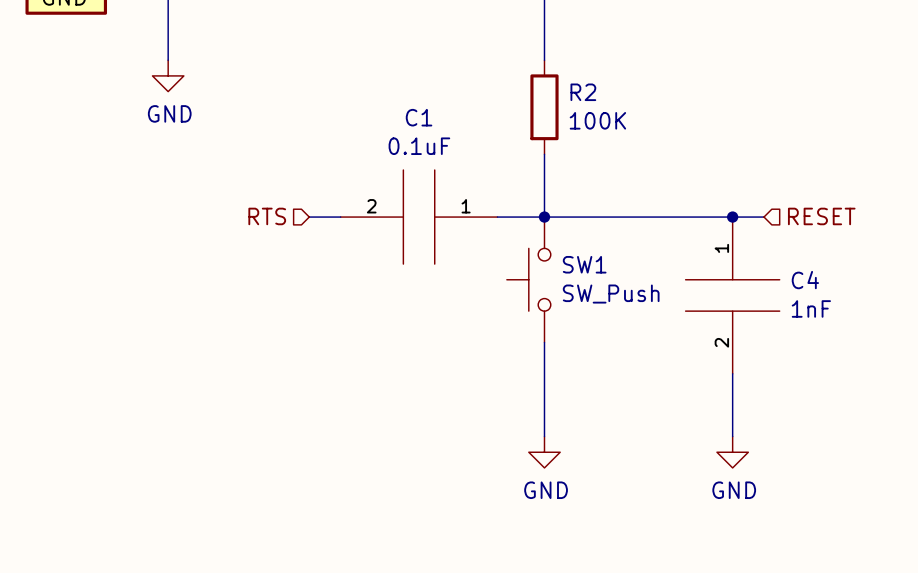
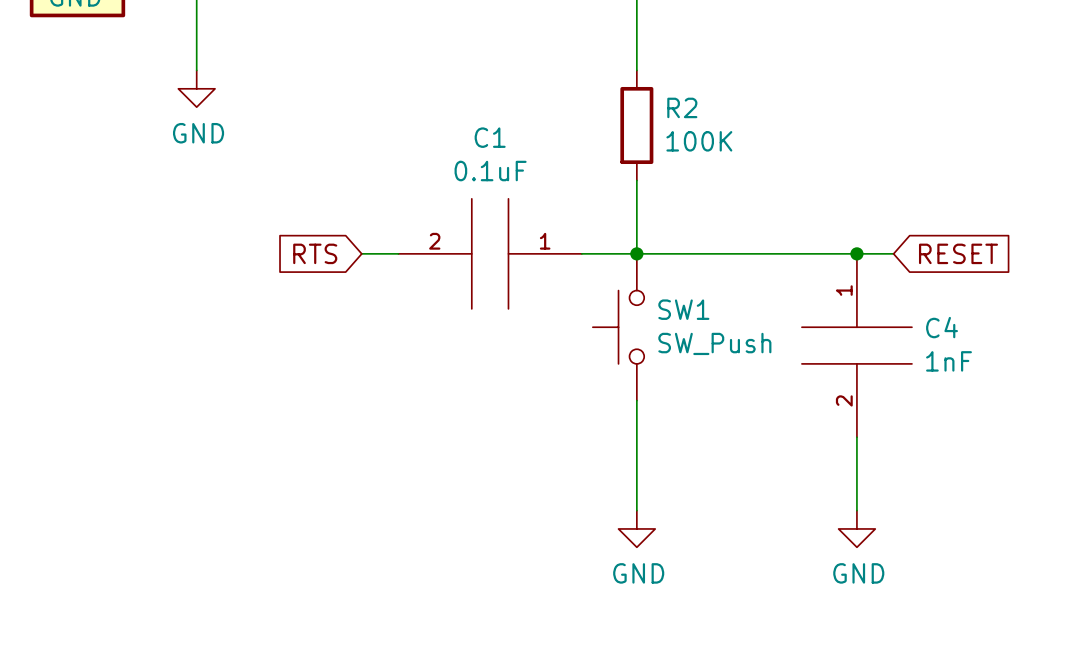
hierarchical label: RTS (267, 216) -> none
hierarchical label: RESET (821, 216) -> none
global label: none -> RTS (315, 253)
global label: none -> RESET (958, 253)

